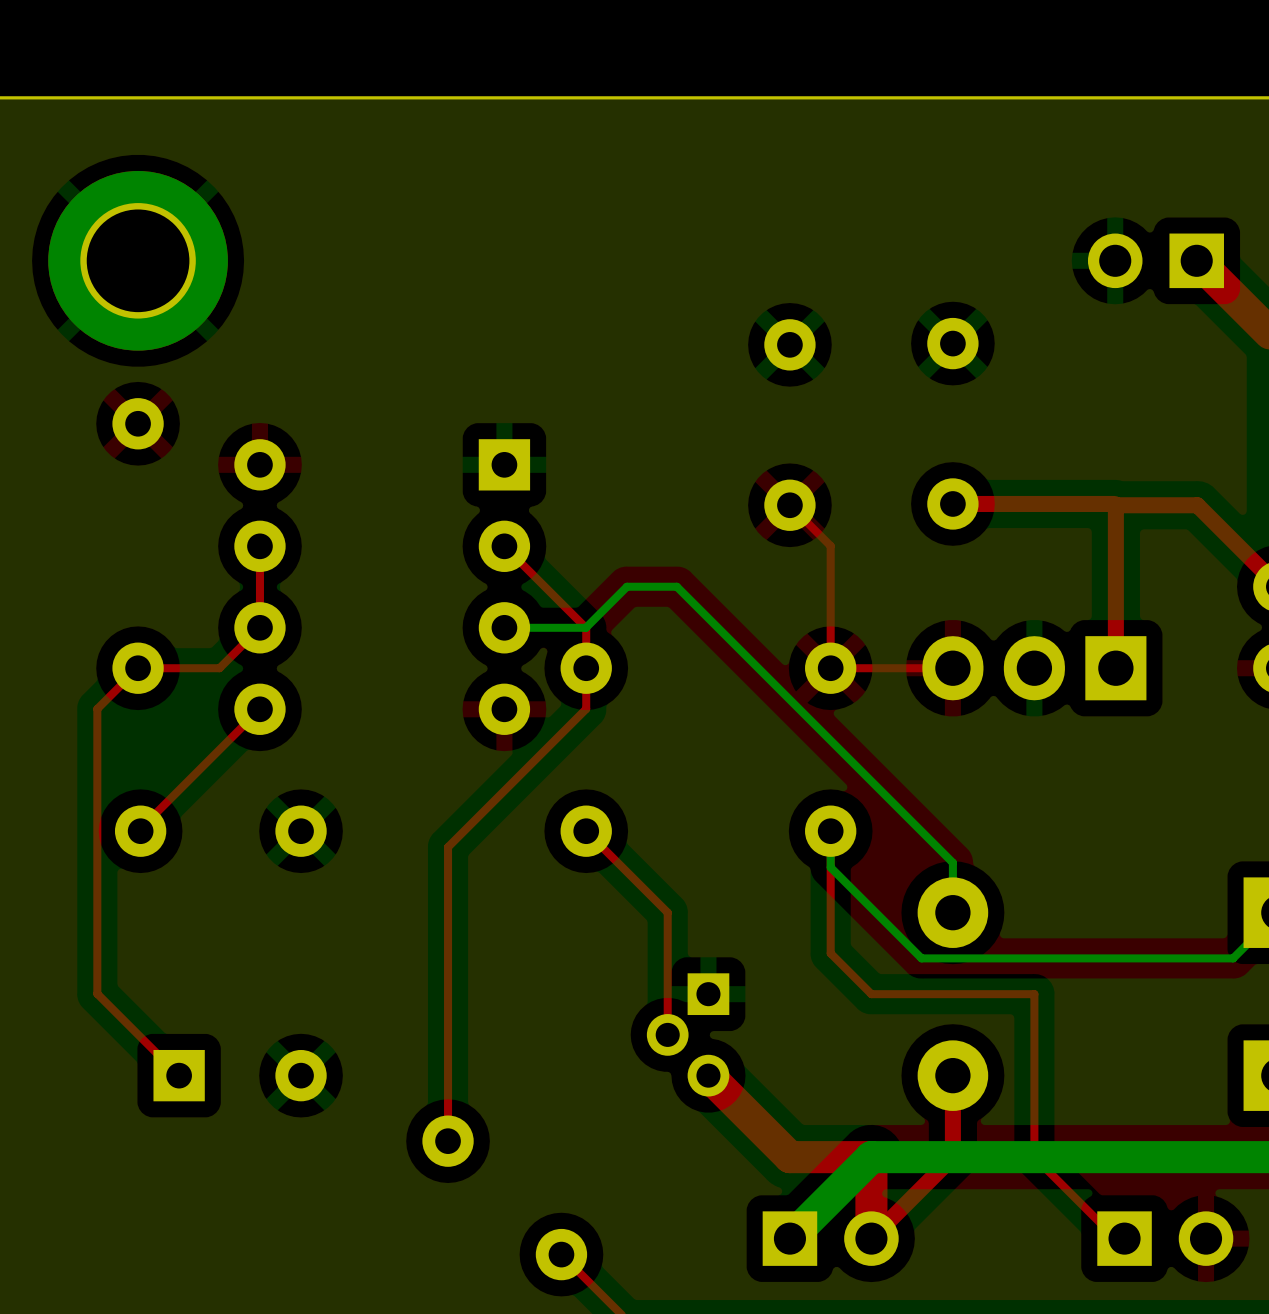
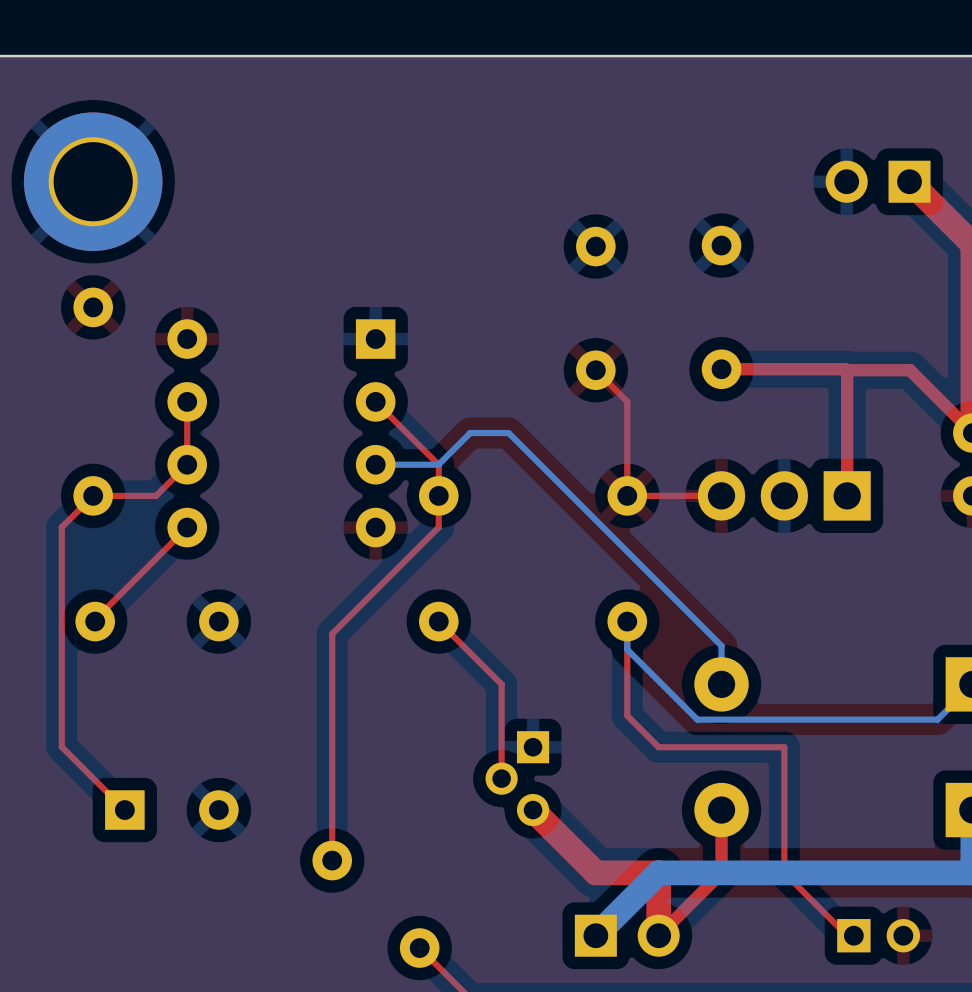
part footprint: [1097, 1211, 1234, 1266] -> [837, 919, 921, 953]

